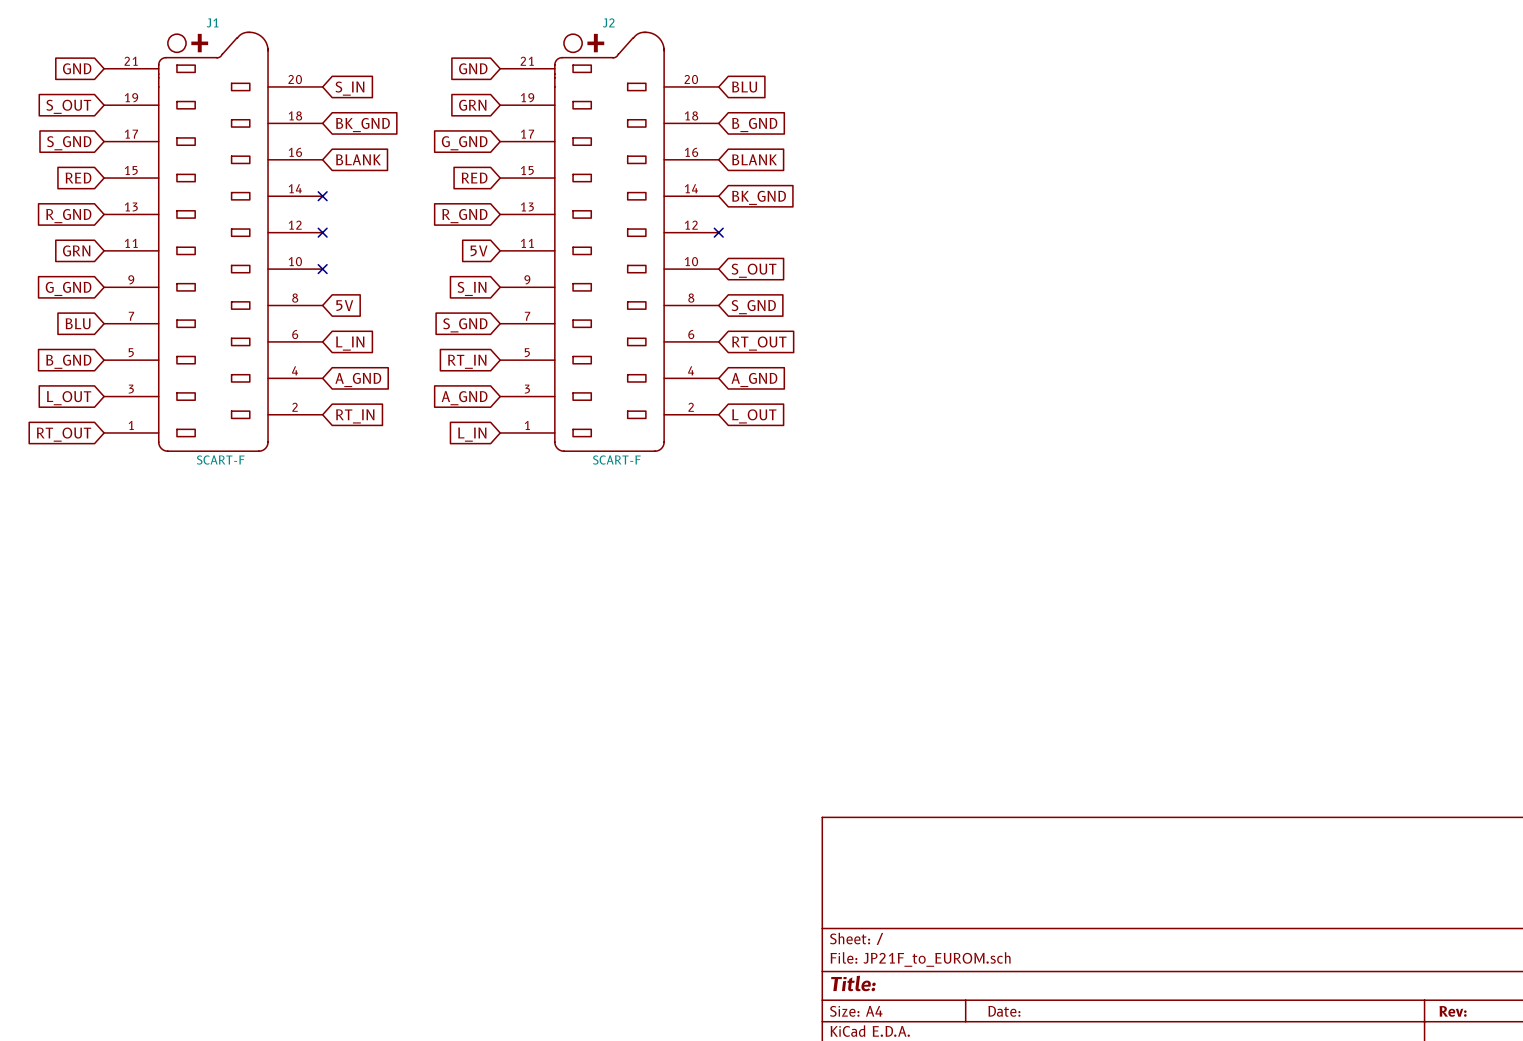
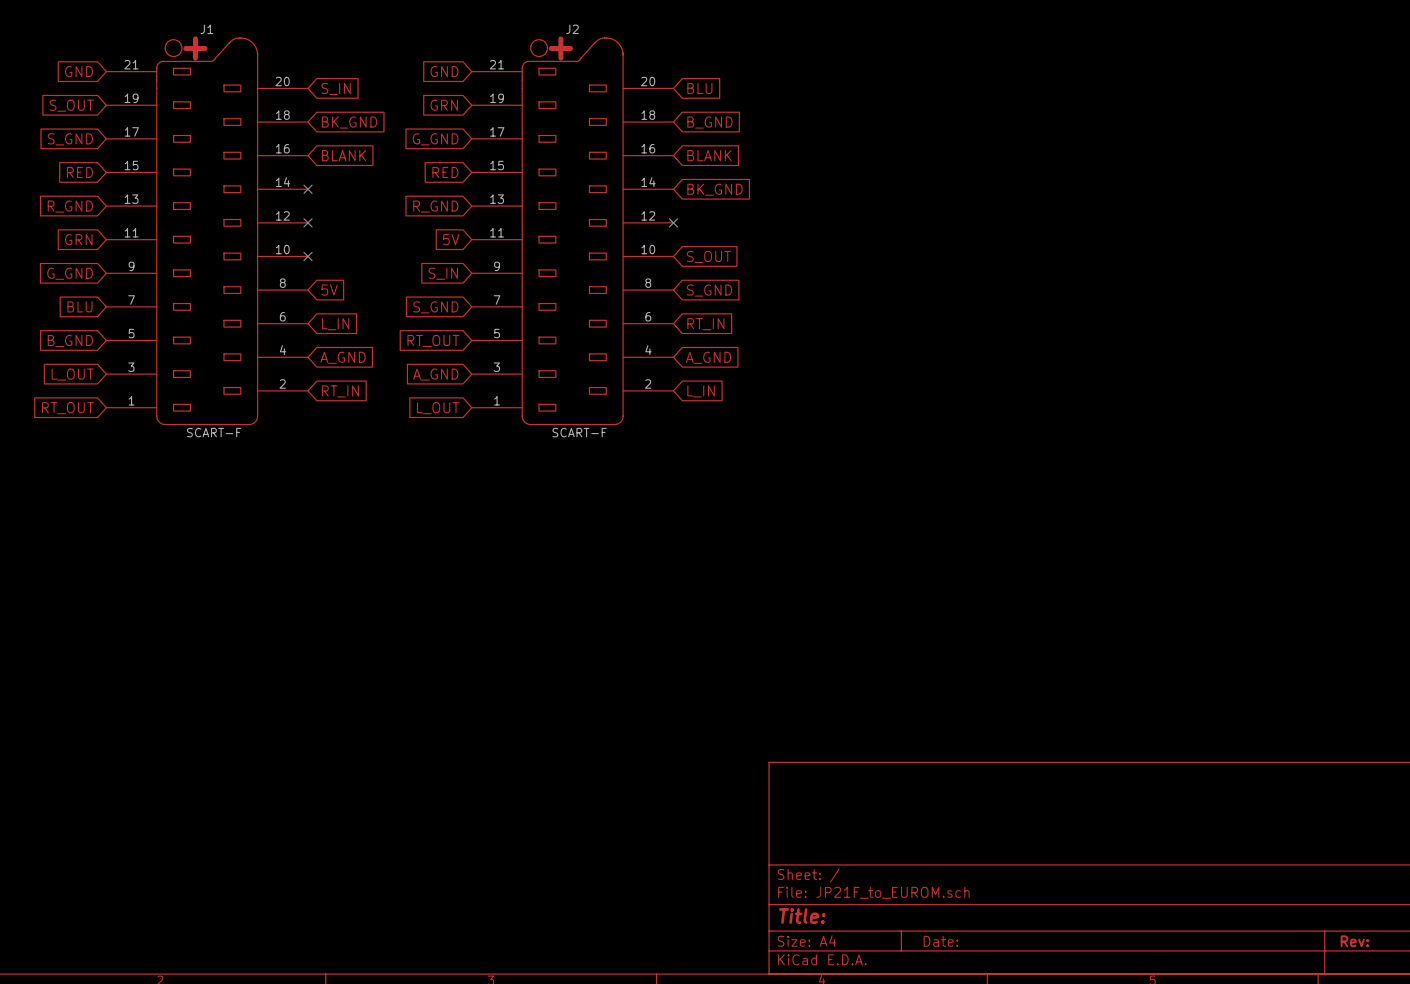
global label: RT_OUT (759, 343) -> RT_IN (705, 324)
global label: RT_IN (467, 361) -> RT_OUT (433, 340)
global label: L_OUT (754, 416) -> L_IN (701, 391)
global label: L_IN (472, 434) -> L_OUT (438, 408)

